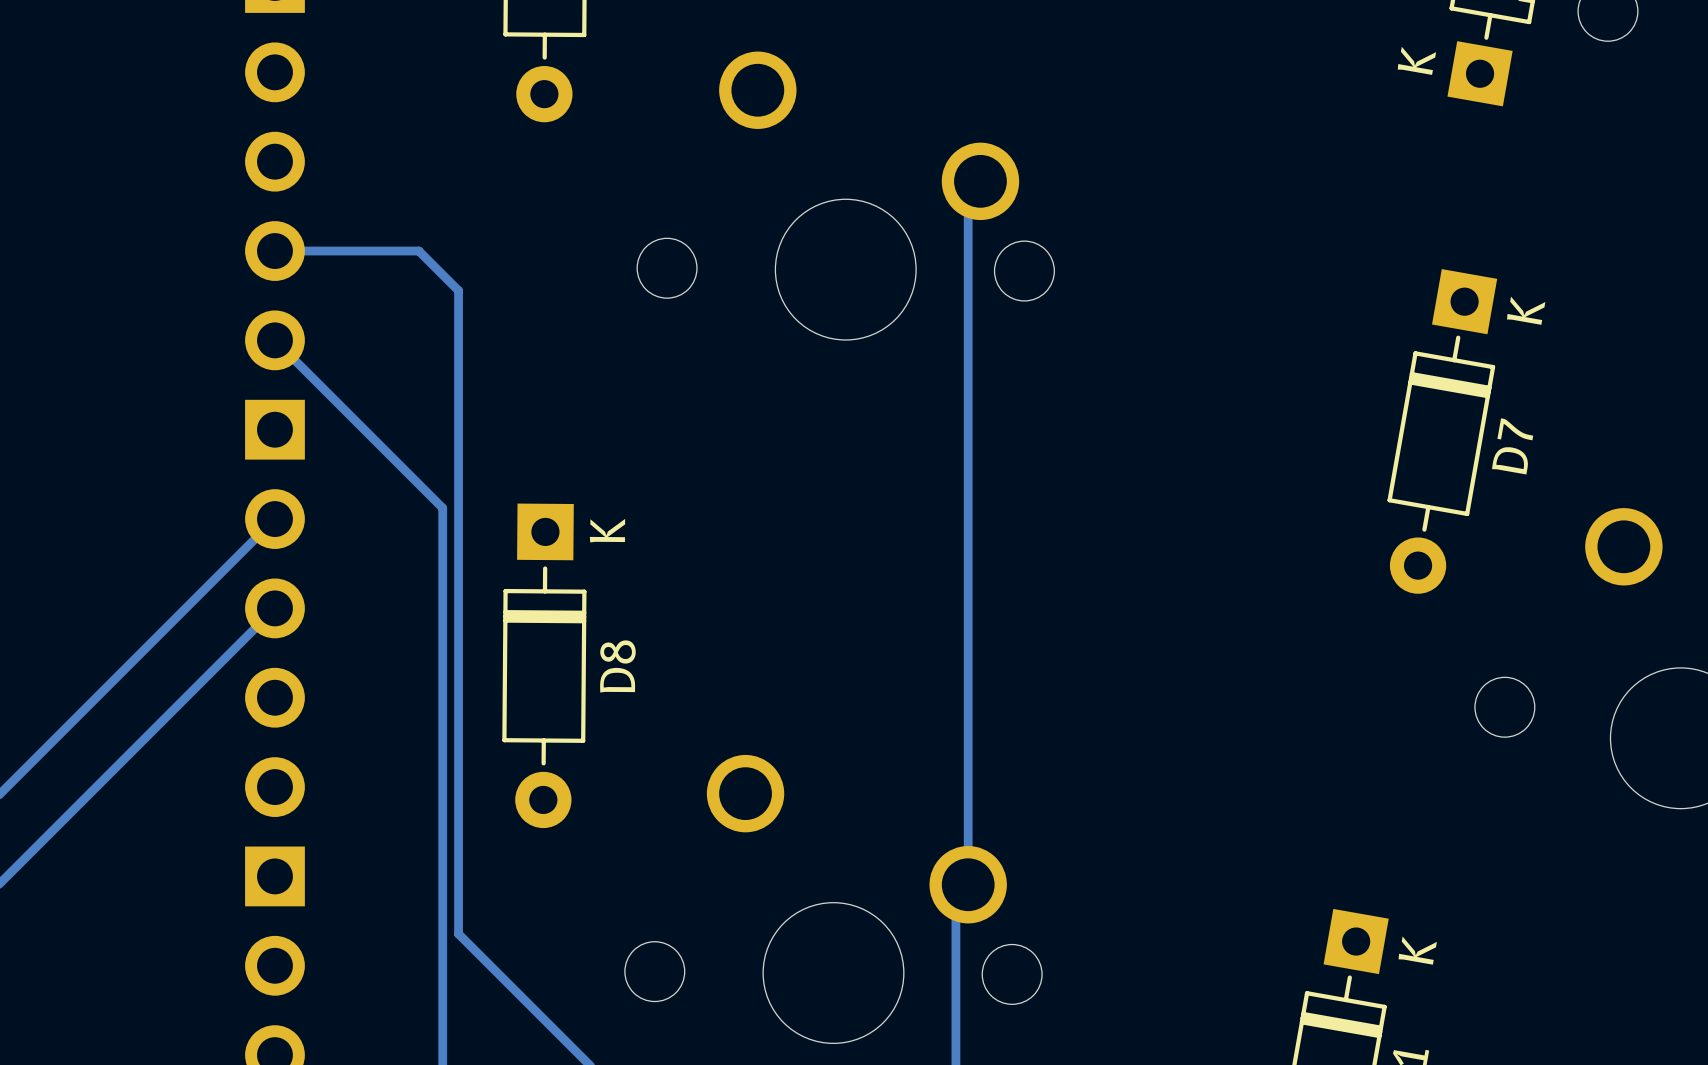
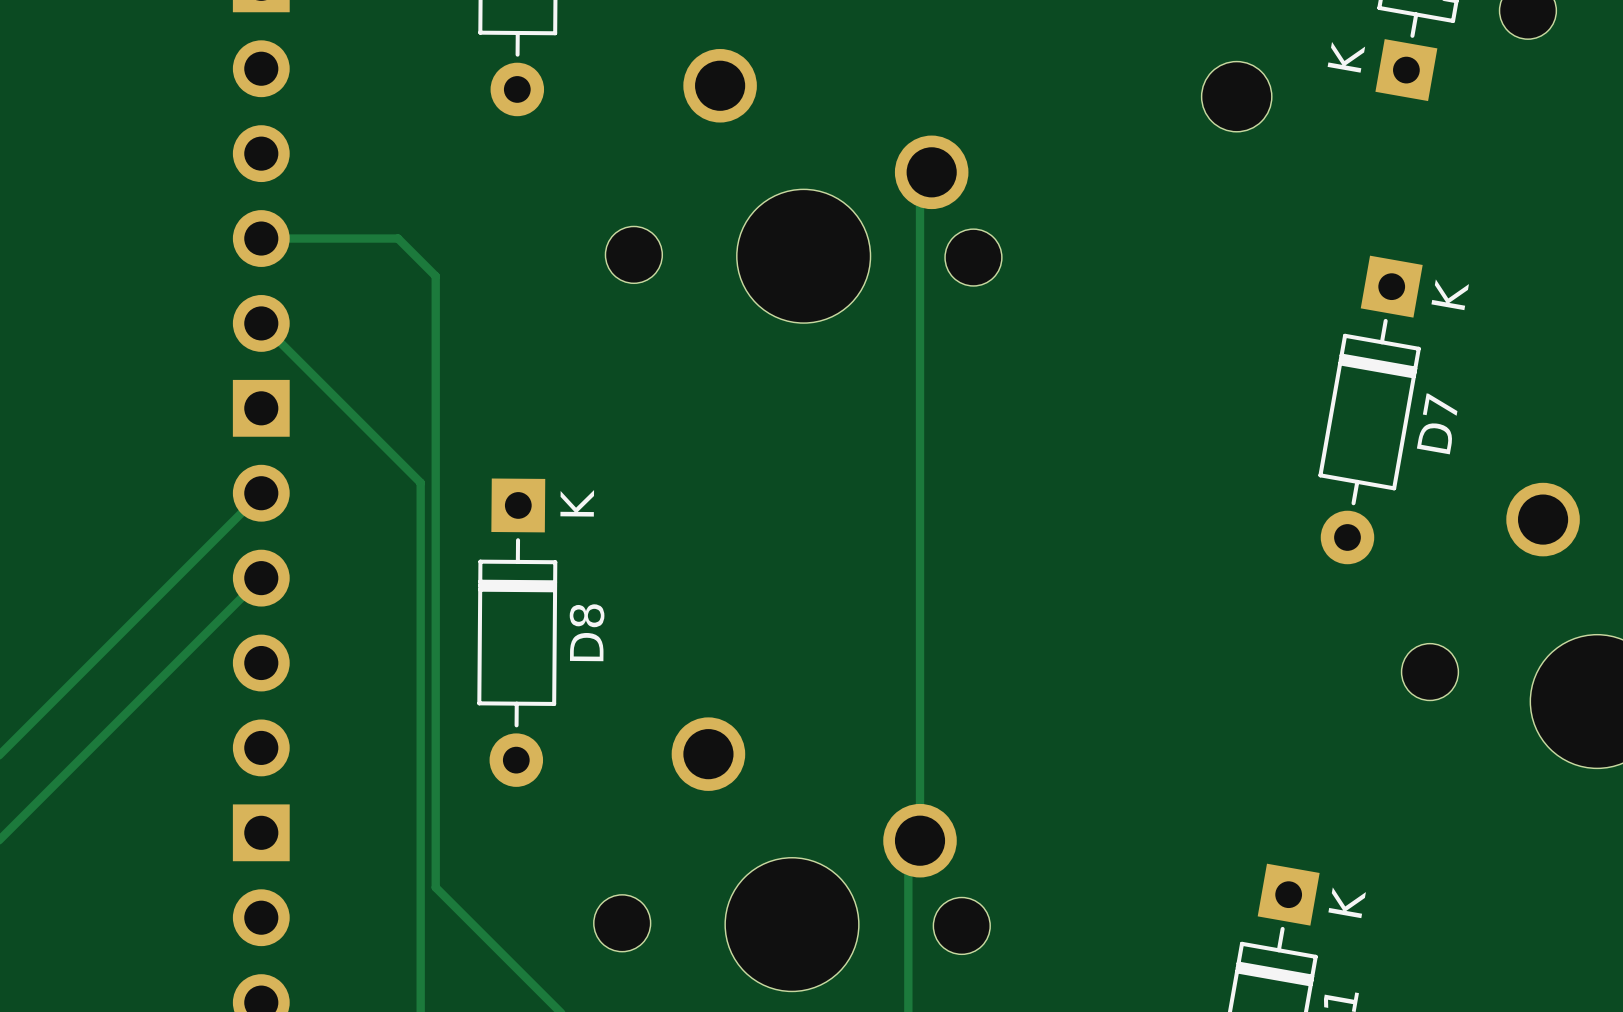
part: none -> (1236, 96)

